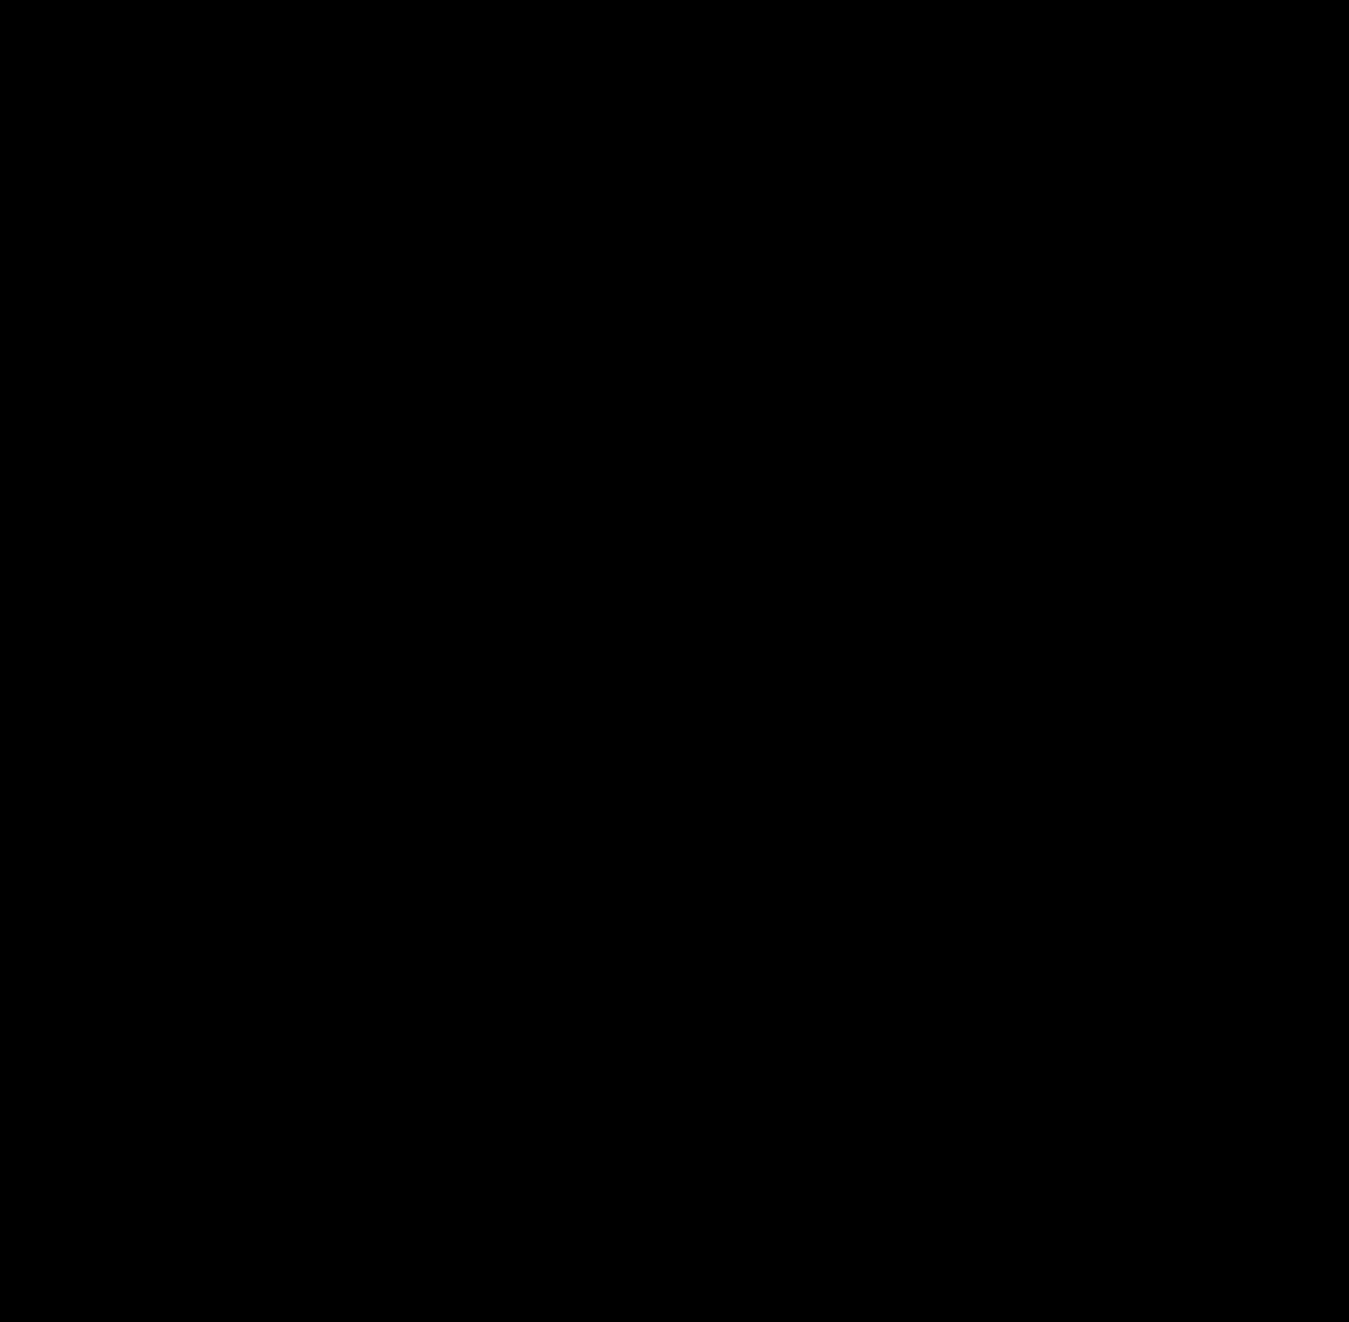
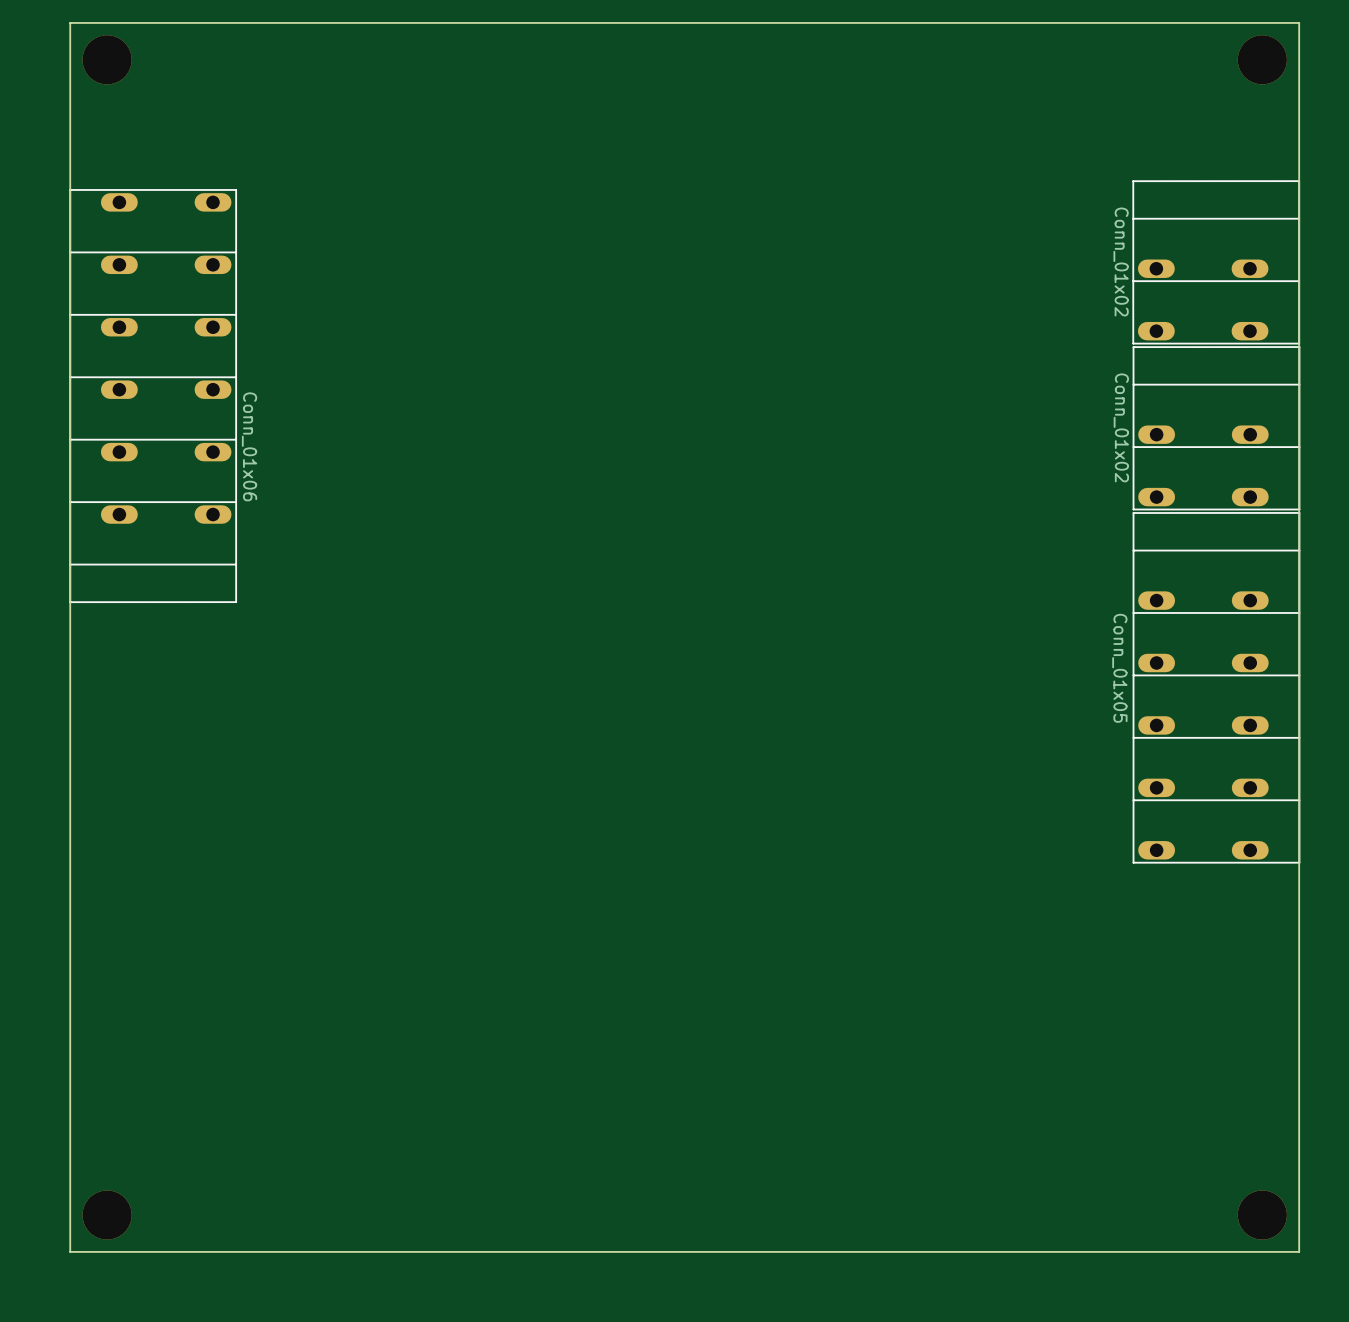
board edge: none -> (1299, 22) (70, 22) (70, 1251) (1299, 1251) (1299, 22)
part: none -> (107, 59)
part: none -> (1262, 59)
part: none -> Conn_01x02 (1216, 262)
part: none -> Conn_01x06 (153, 396)
part: none -> Conn_01x02 (1216, 428)
part: none -> Conn_01x05 (1216, 687)
part: none -> (107, 1215)
part: none -> (1262, 1215)

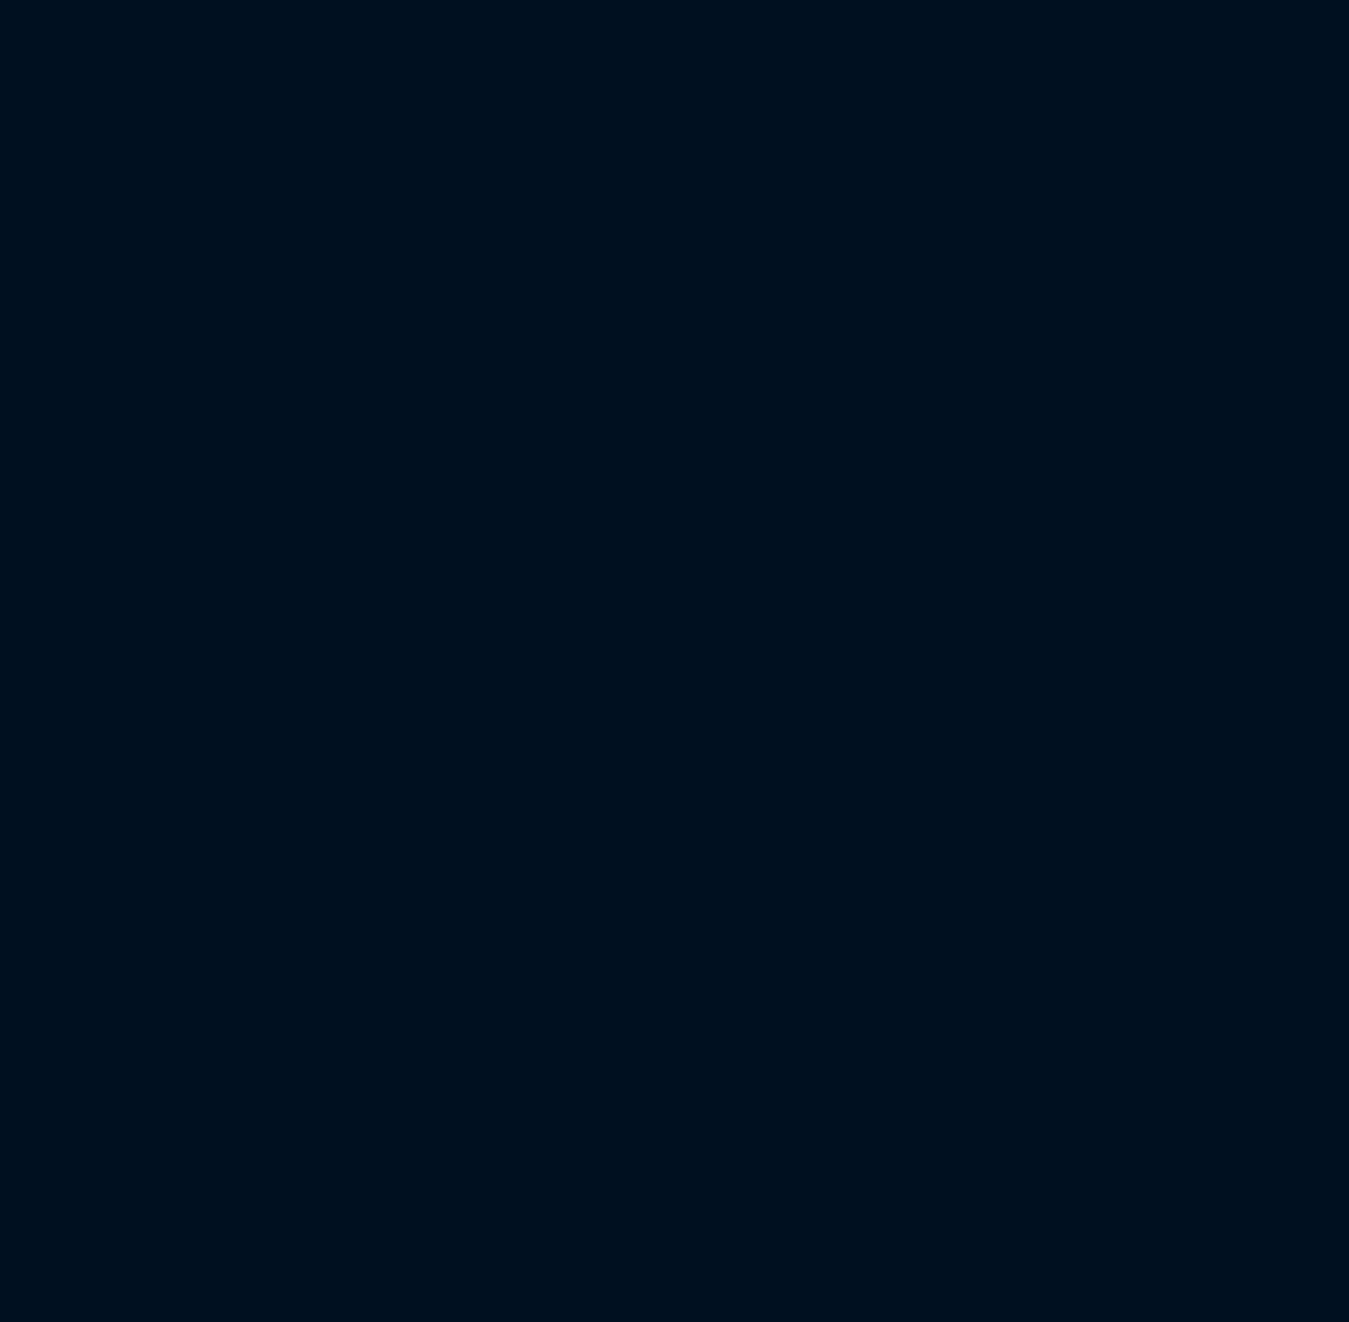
board edge: (1299, 22) (70, 22) (70, 1251) (1299, 1251) (1299, 22) -> none
part: (107, 59) -> none
part: (1262, 59) -> none
part: Conn_01x02 (1216, 262) -> none
part: Conn_01x06 (153, 396) -> none
part: Conn_01x02 (1216, 428) -> none
part: Conn_01x05 (1216, 687) -> none
part: (107, 1215) -> none
part: (1262, 1215) -> none

